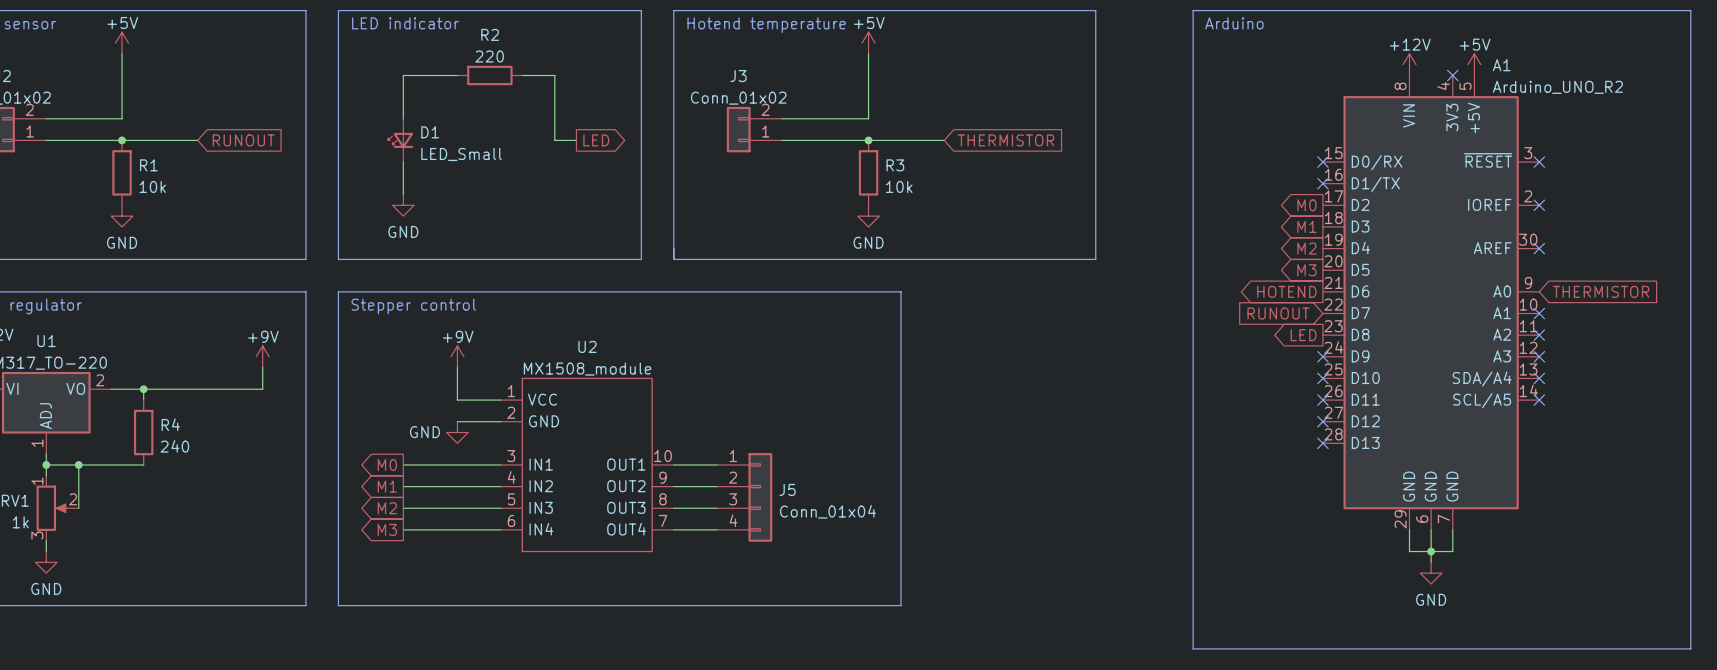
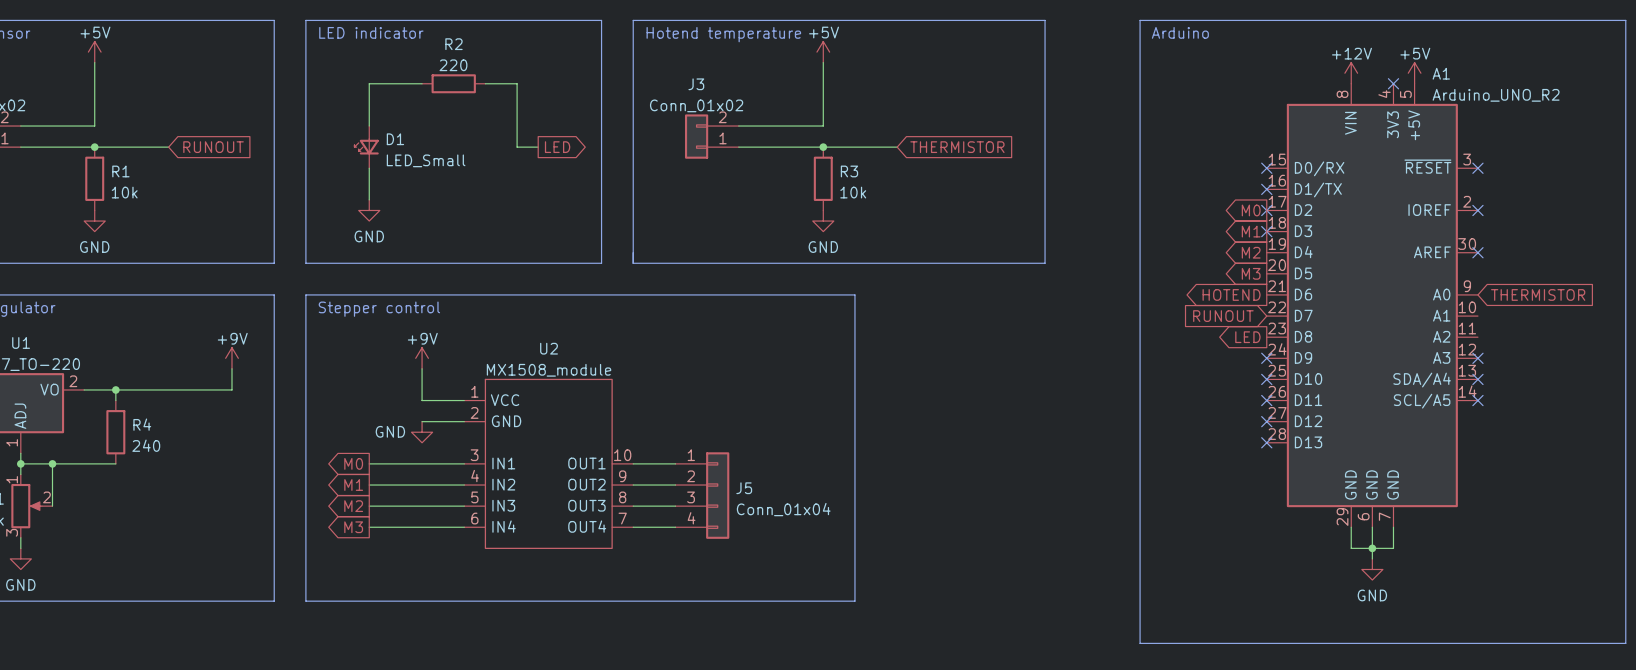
no-connect mark: none -> (1266, 210)
no-connect mark: none -> (1266, 231)
no-connect mark: (1539, 313) -> none
no-connect mark: (1539, 335) -> none

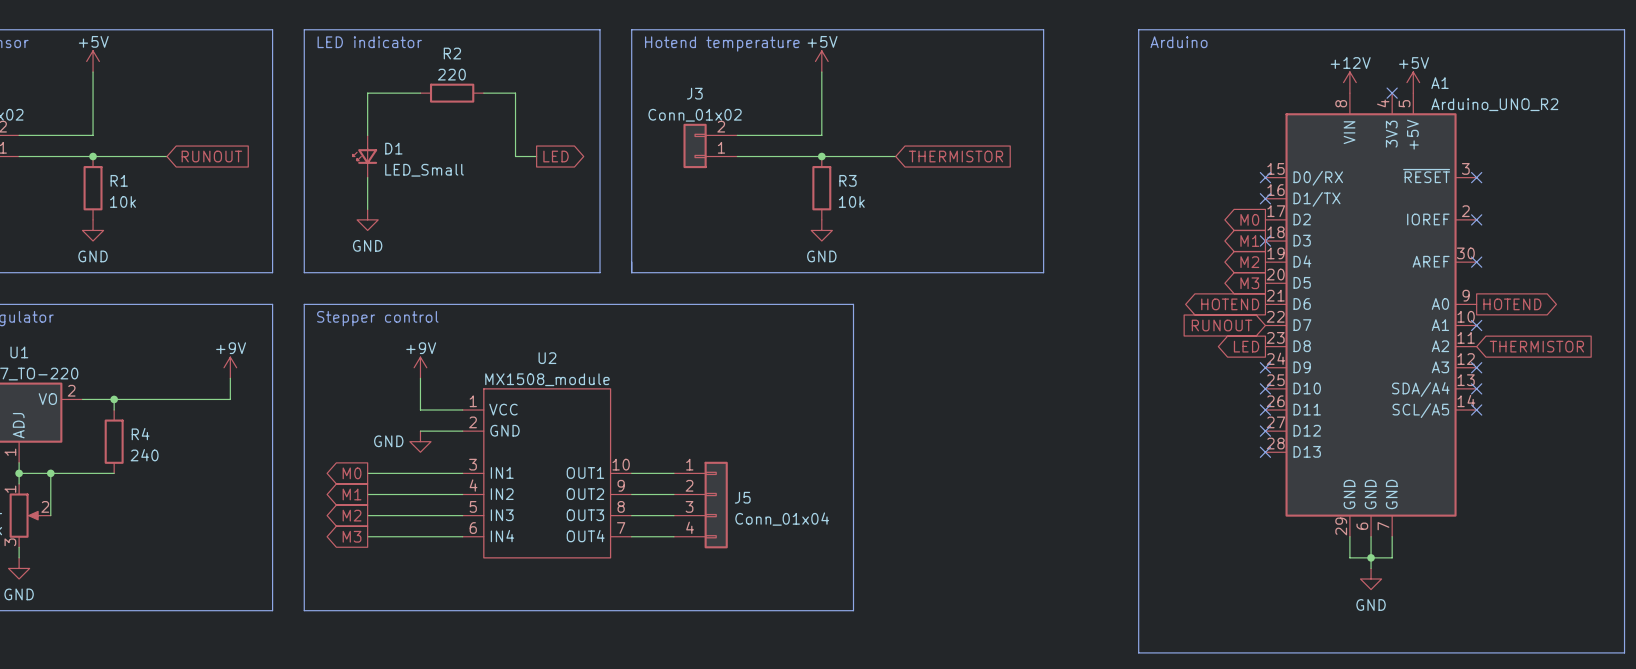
no-connect mark: (1266, 210) -> none
global label shape: input (1538, 294) -> output (1512, 304)
global label: THERMISTOR (1538, 294) -> HOTEND (1512, 304)
no-connect mark: none -> (1476, 325)
global label: none -> THERMISTOR (1536, 346)

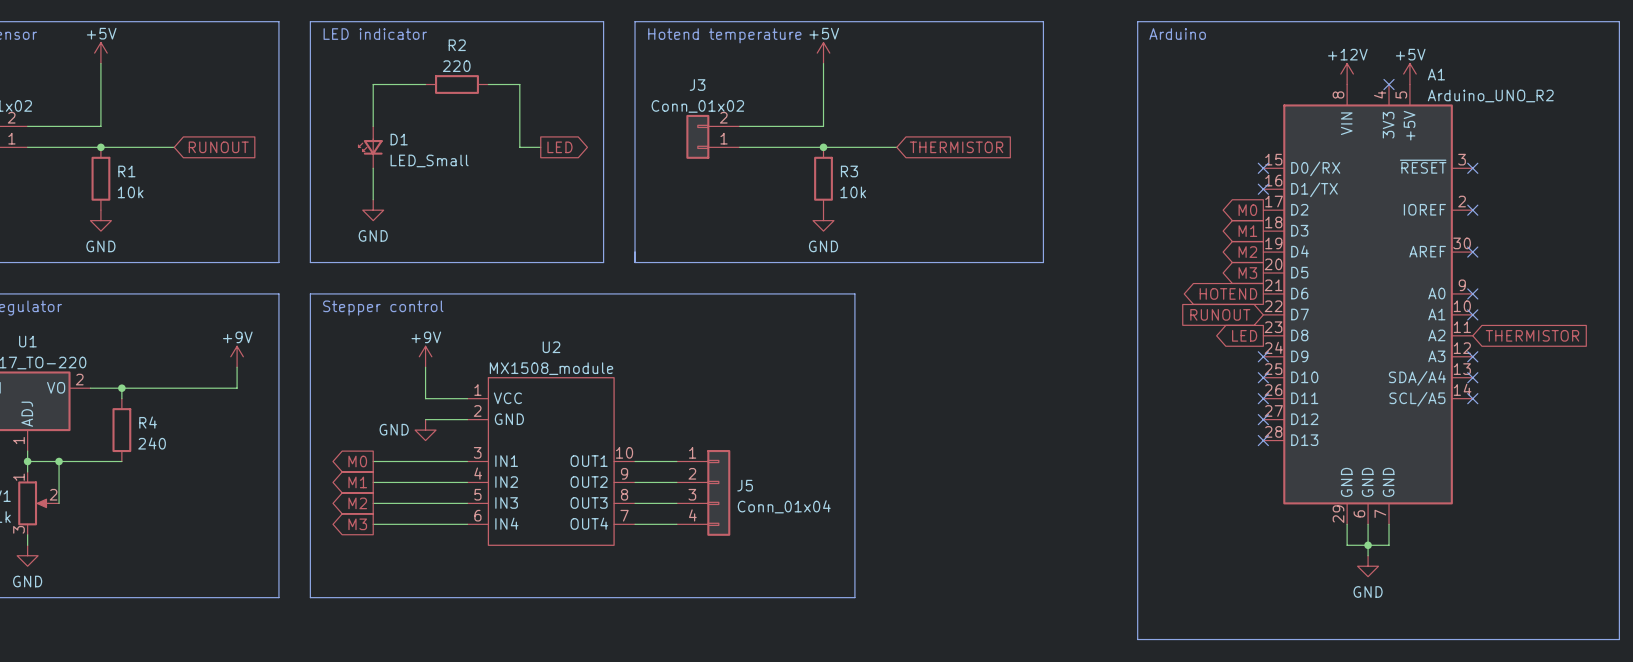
no-connect mark: (1265, 241) -> none
no-connect mark: none -> (1472, 293)
global label: HOTEND (1512, 304) -> none

